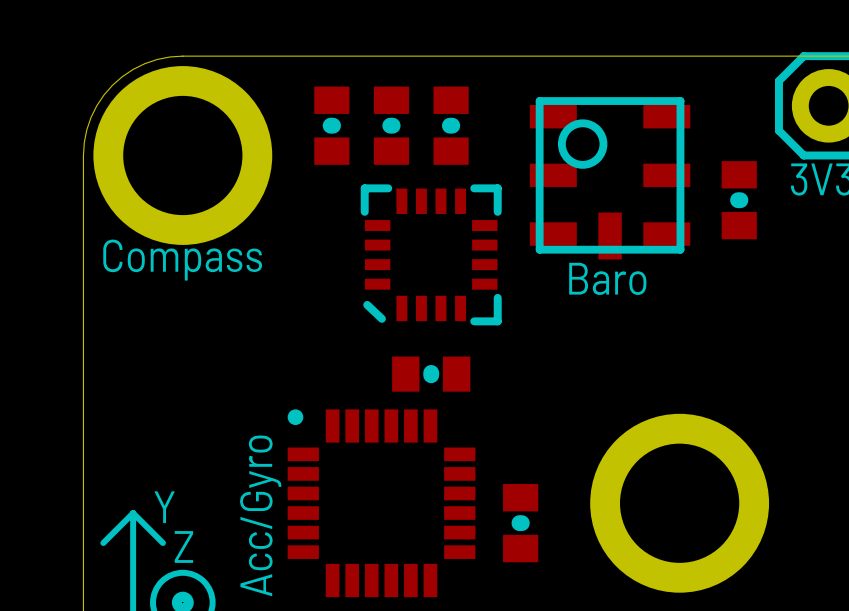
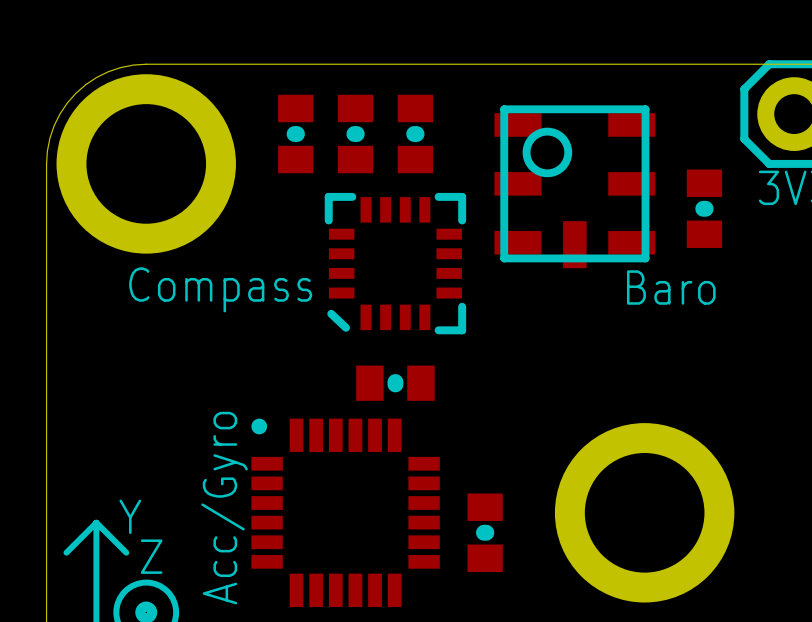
text position: Compass (182, 260) -> Compass (220, 289)
text position: Baro (607, 278) -> Baro (671, 287)

